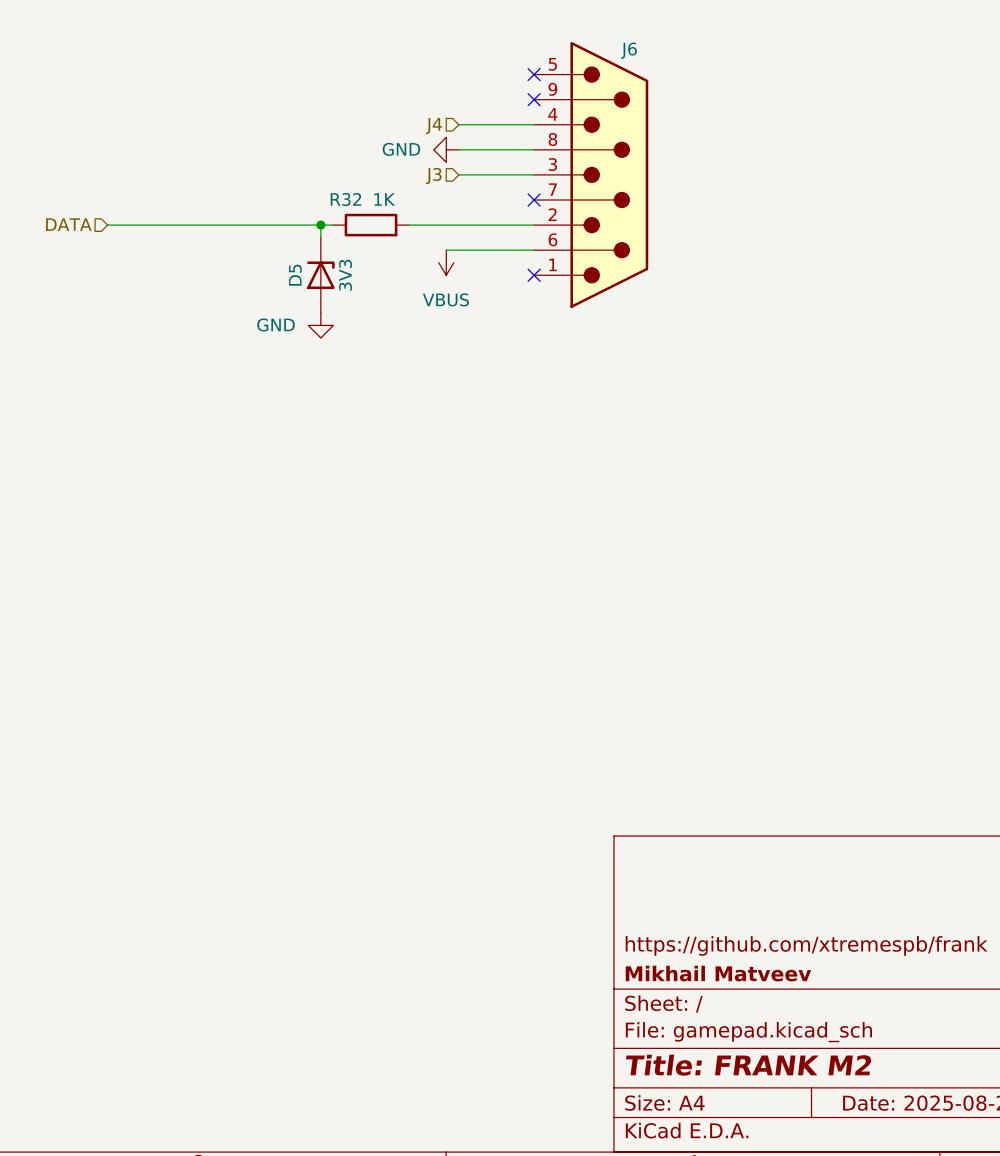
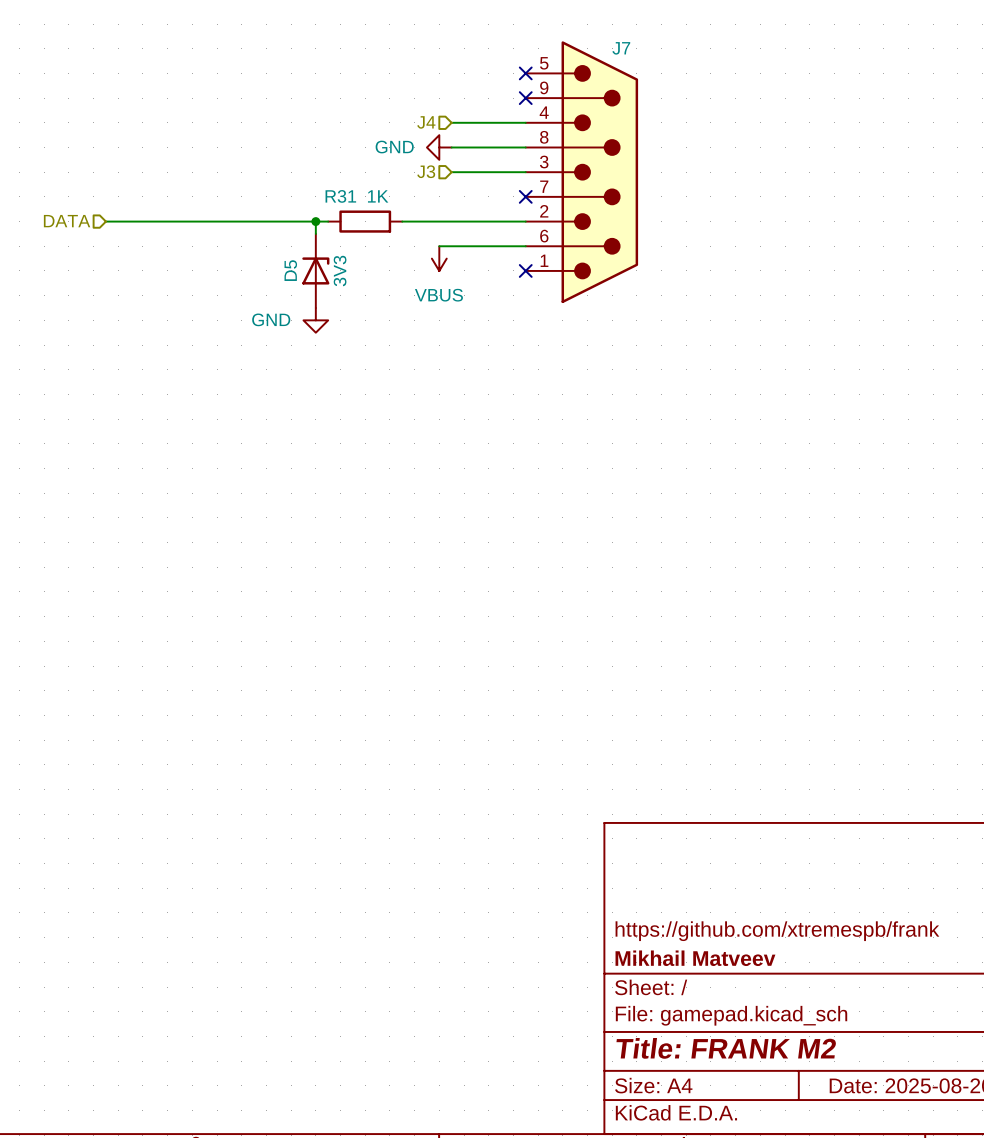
J6 name: J6 (628, 50) -> J7 (621, 48)
R32 name: R32 (345, 199) -> R31 (340, 196)

